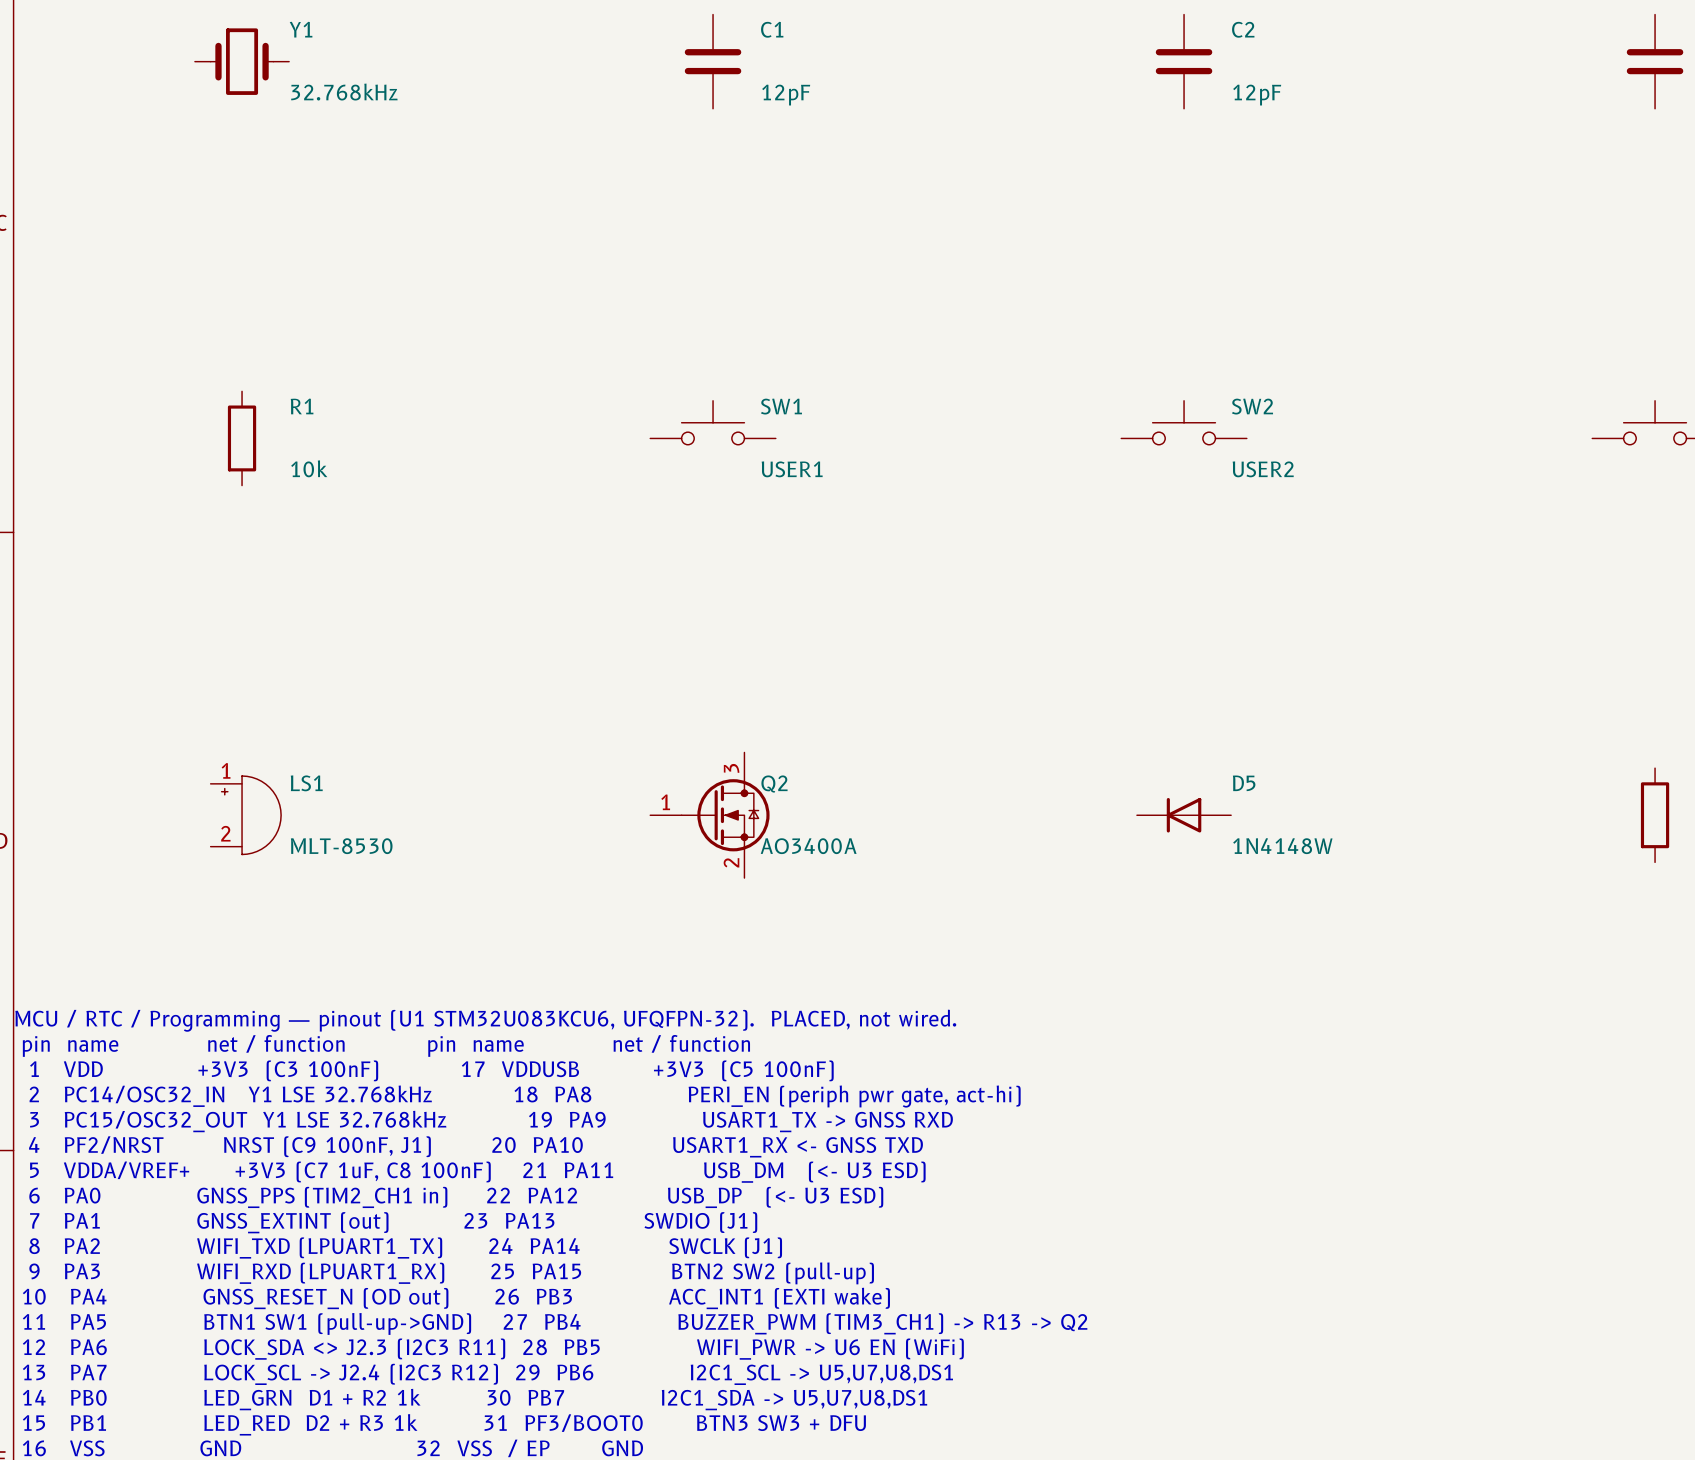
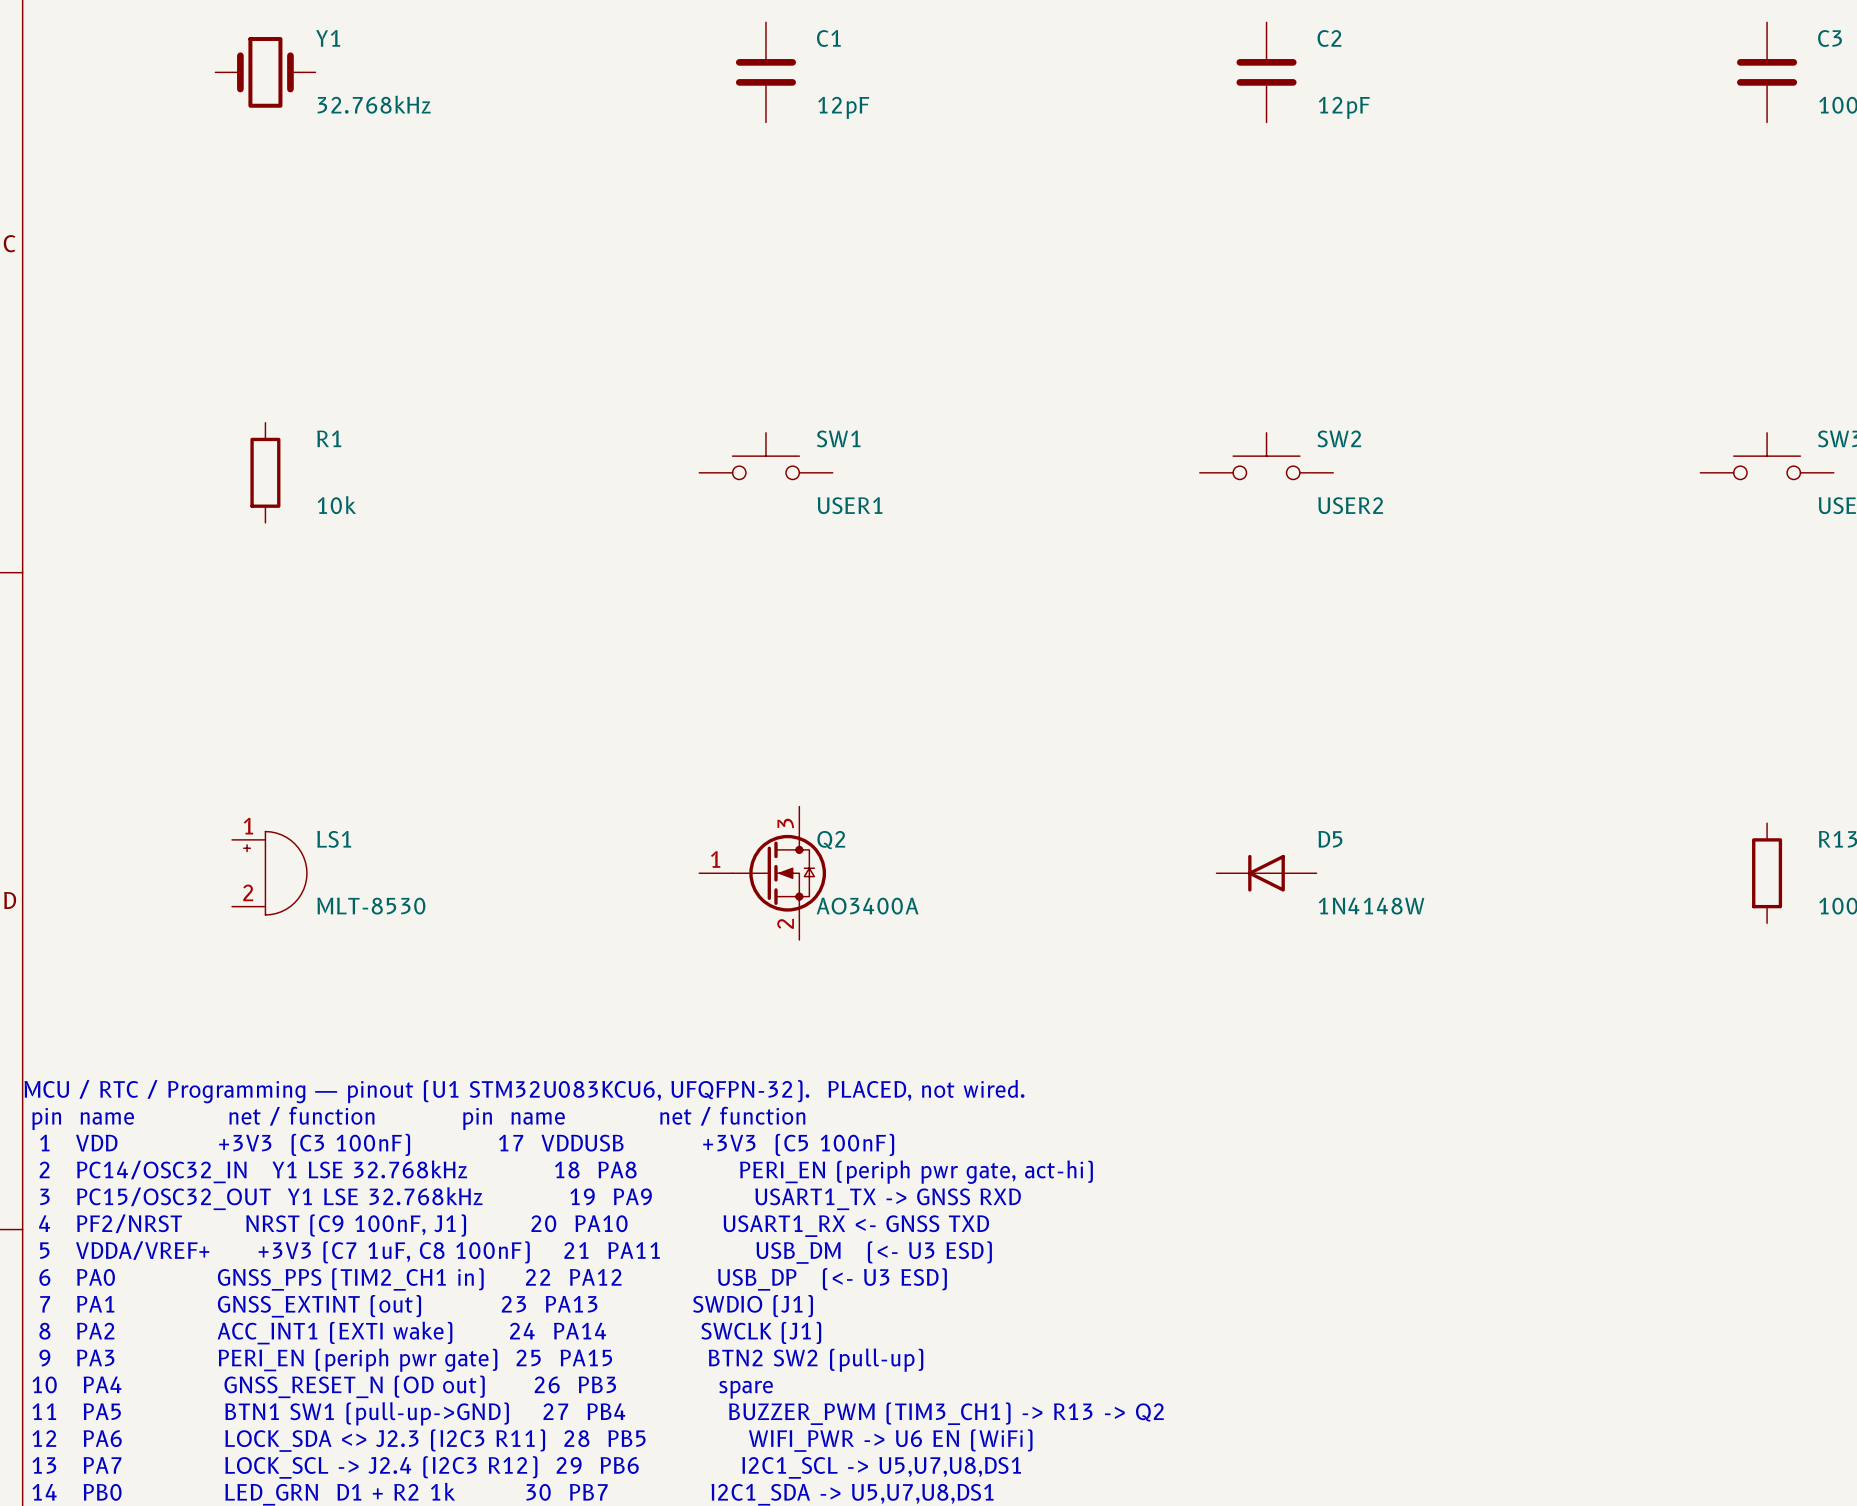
text: 8 PA2 WIFI_TXD (LPUART1_TX) 24 PA14 SWCLK (J1) (405, 1247) -> 8 PA2 ACC_INT1 (EXTI wake) 24 PA14 SWCLK (J1) (430, 1333)
text: 9 PA3 WIFI_RXD (LPUART1_RX) 25 PA15 BTN2 SW2 (pull-up) (451, 1273) -> 9 PA3 PERI_EN (periph pwr gate) 25 PA15 BTN2 SW2 (pull-up) (481, 1360)
text: 10 PA4 GNSS_RESET_N (OD out) 26 PB3 ACC_INT1 (EXTI wake) (456, 1298) -> 10 PA4 GNSS_RESET_N (OD out) 26 PB3 spare (402, 1387)

